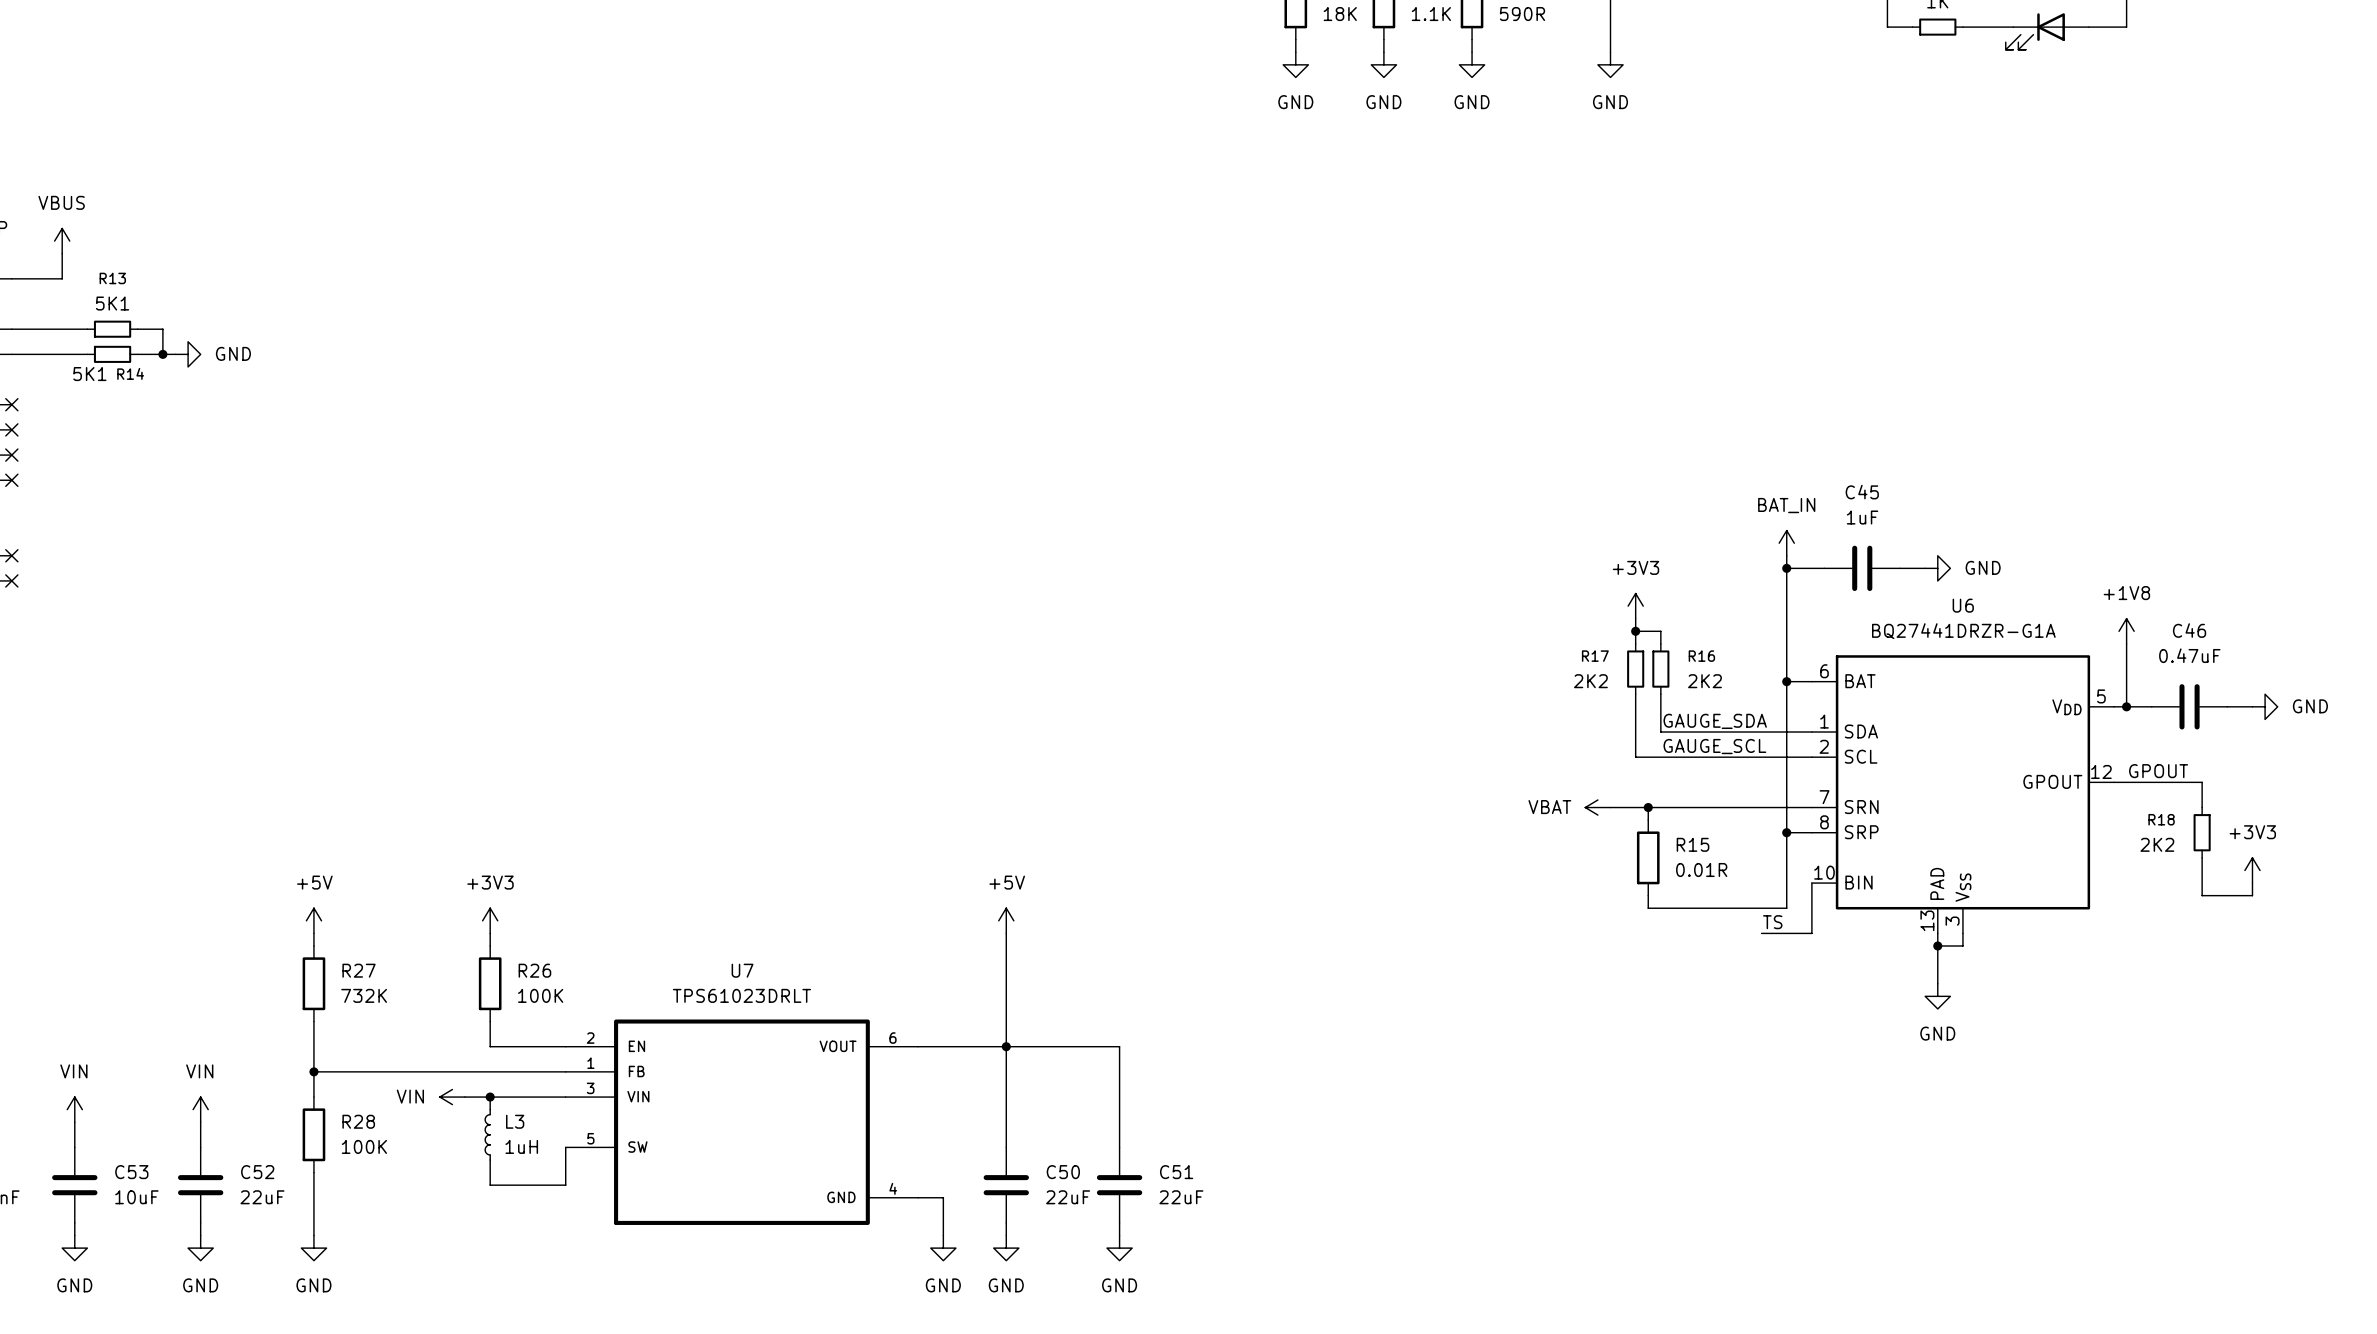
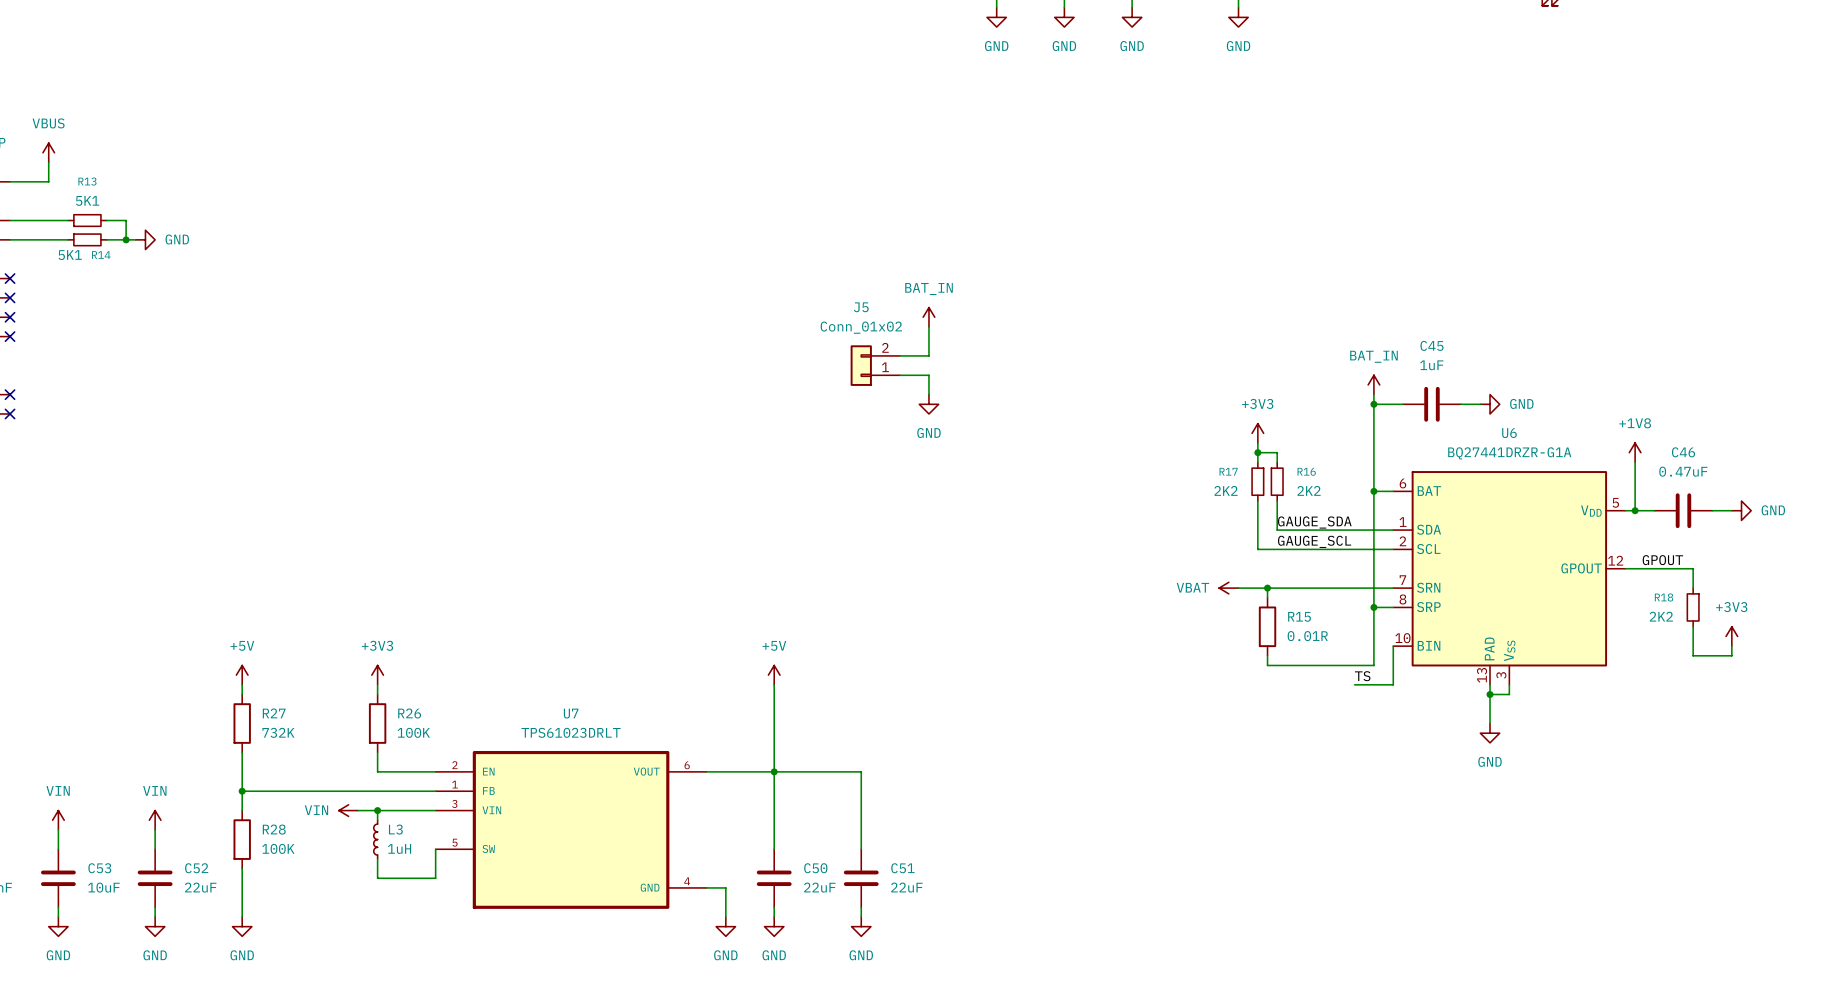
power symbol: none -> BAT_IN (928, 317)
wire: none -> (928, 326) (928, 355) (899, 355)
J5: none -> Conn_01x02 (875, 365)
wire: none -> (899, 375) (928, 375) (928, 394)
power symbol: none -> GND (928, 404)

